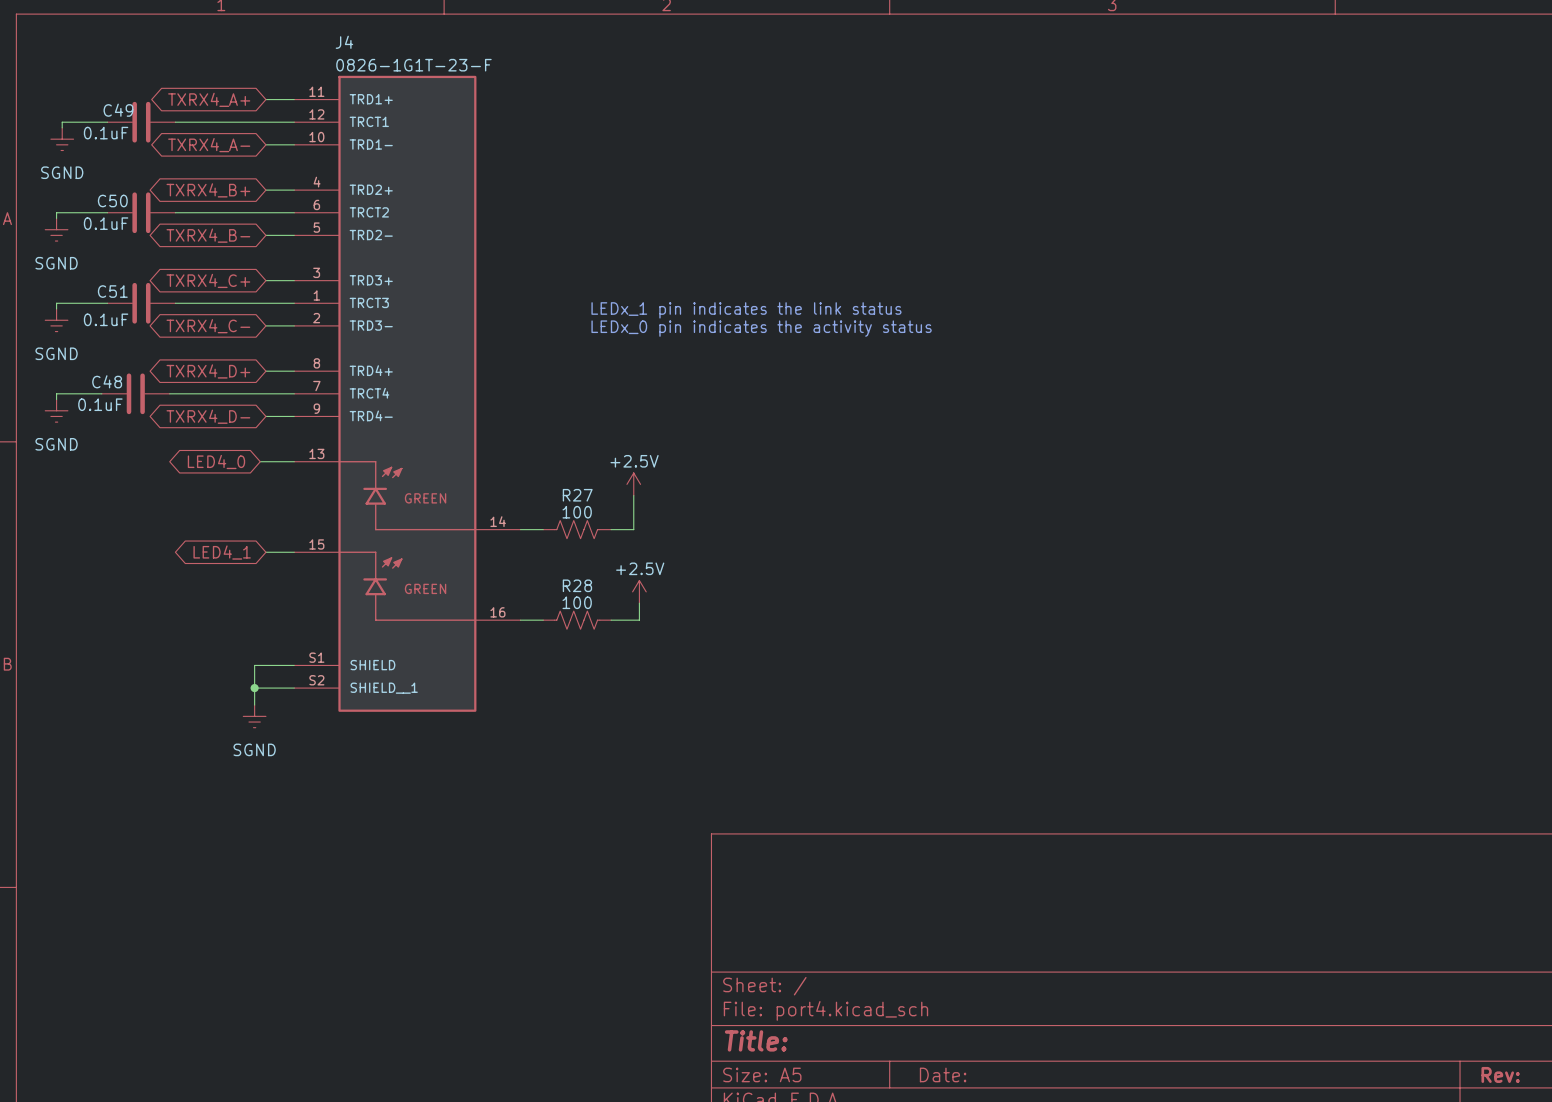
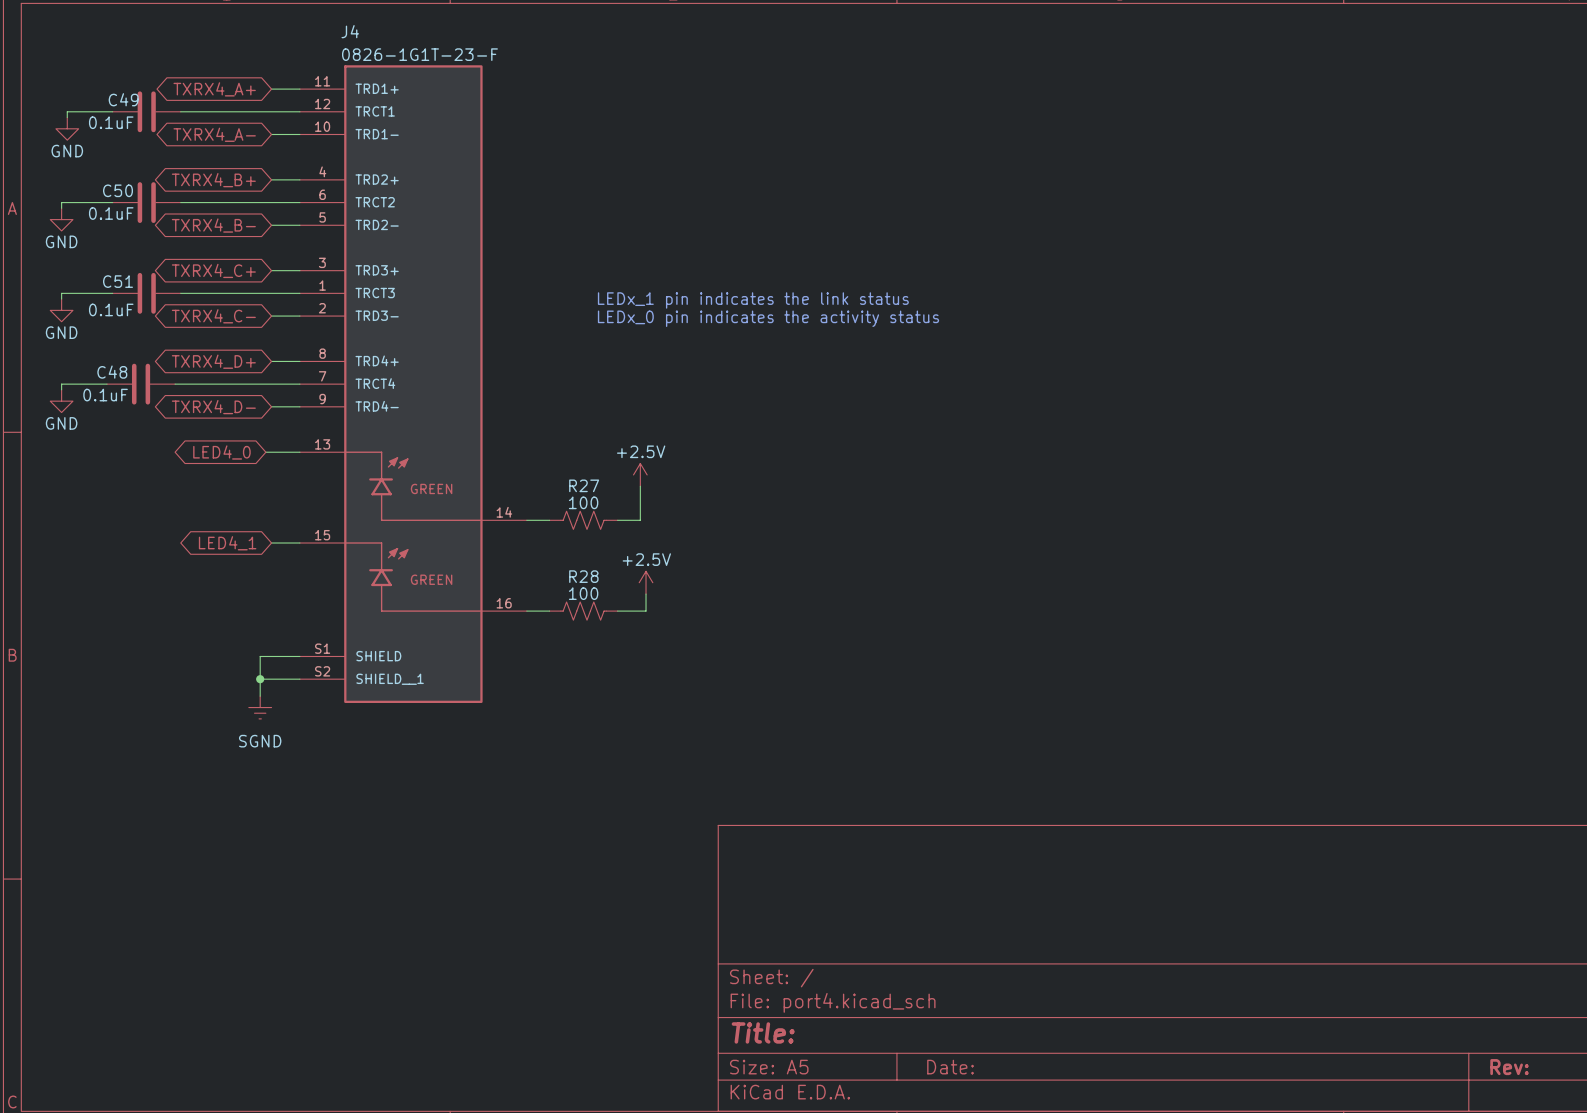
power symbol: SGND (62, 139) -> GND (67, 128)
power symbol: SGND (56, 229) -> GND (61, 219)
power symbol: SGND (56, 320) -> GND (61, 310)
power symbol: SGND (56, 410) -> GND (61, 401)

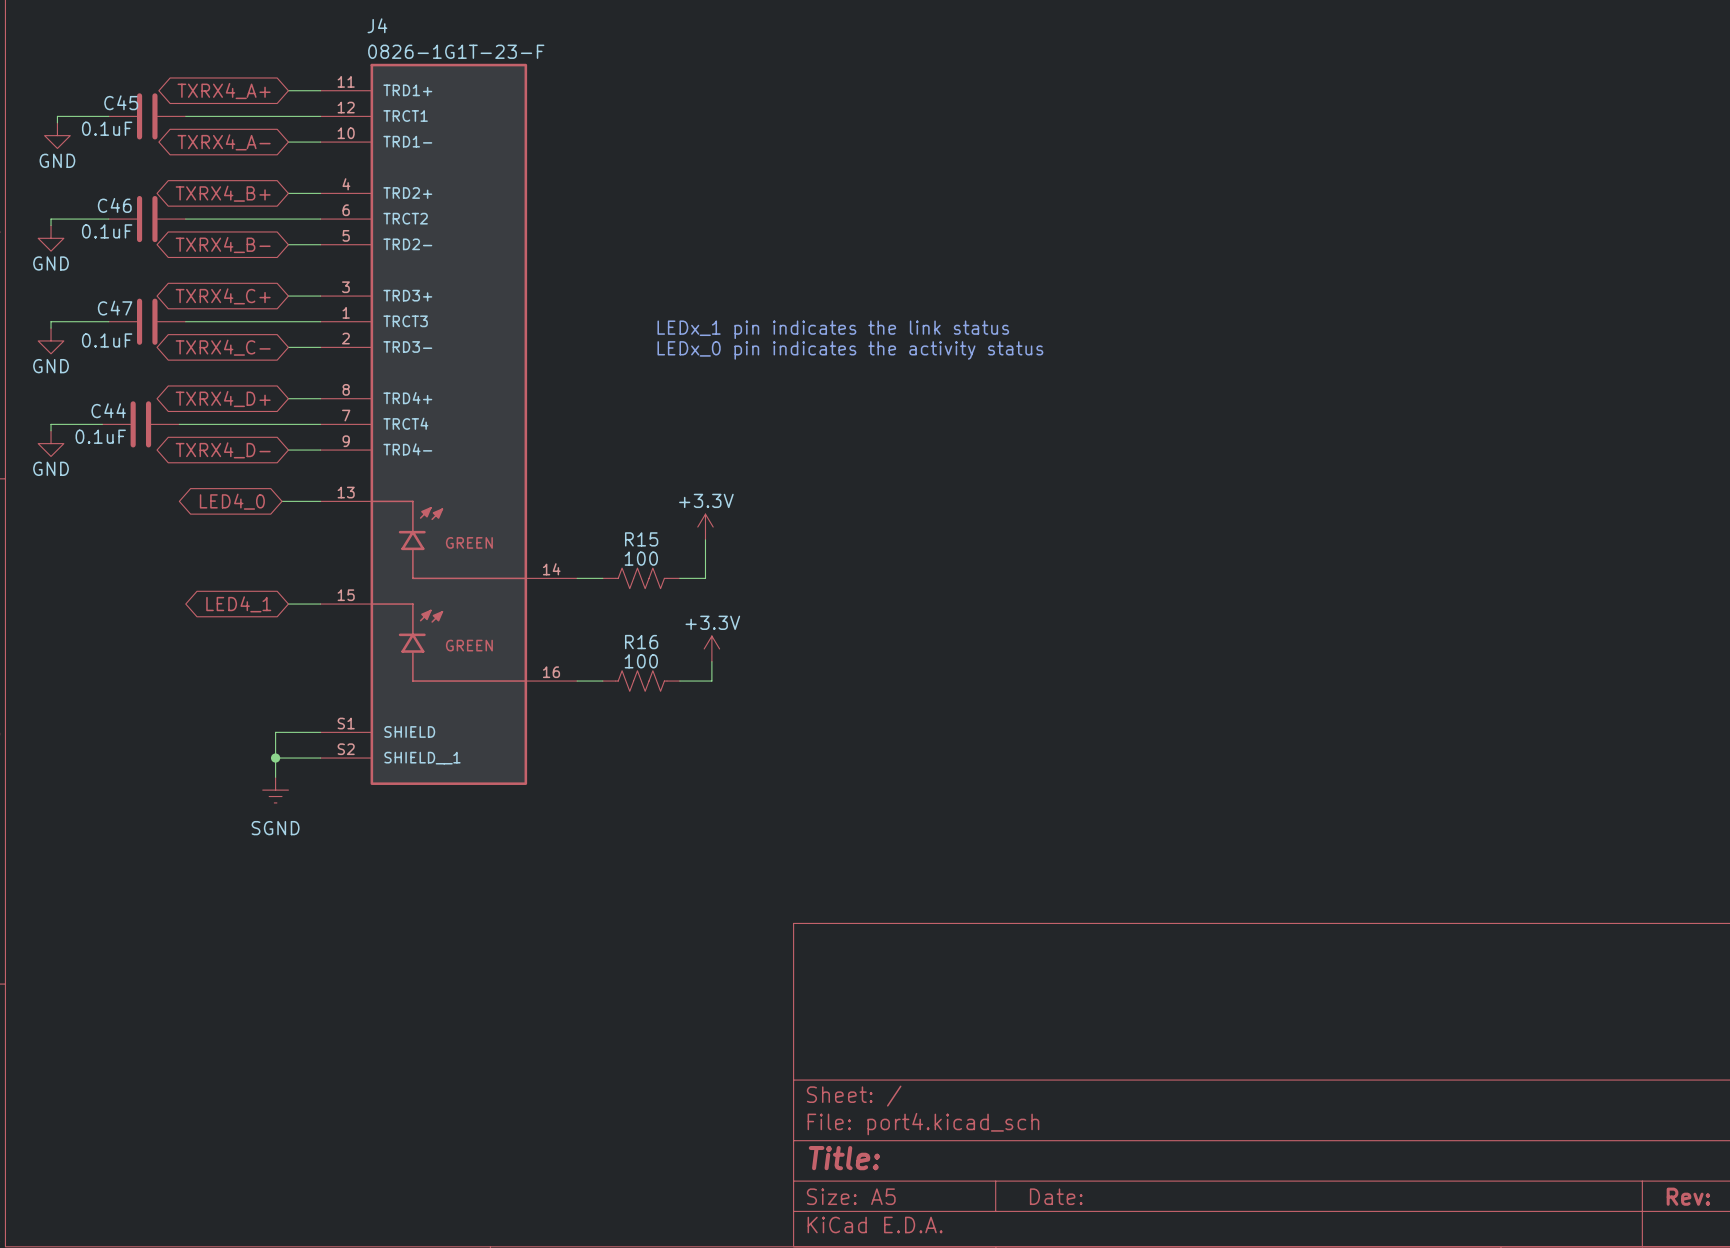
C49 name: C49 (123, 99) -> C45 (121, 102)
C50 name: C50 (117, 190) -> C46 (114, 205)
C51 name: C51 (117, 281) -> C47 (115, 308)
C48 name: C48 (112, 372) -> C44 (108, 410)
power symbol: +2.5V (640, 474) -> +3.3V (705, 527)
R27 name: R27 (584, 485) -> R15 (641, 539)
R28 name: R28 (583, 576) -> R16 (641, 642)
power symbol: +2.5V (646, 582) -> +3.3V (711, 648)

